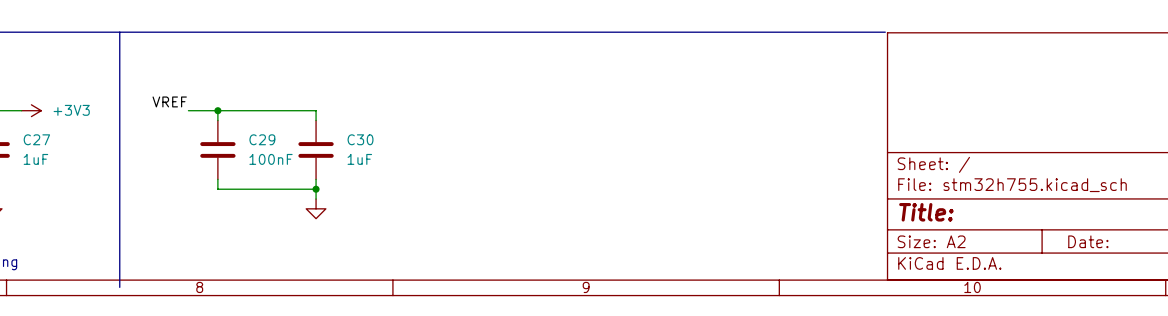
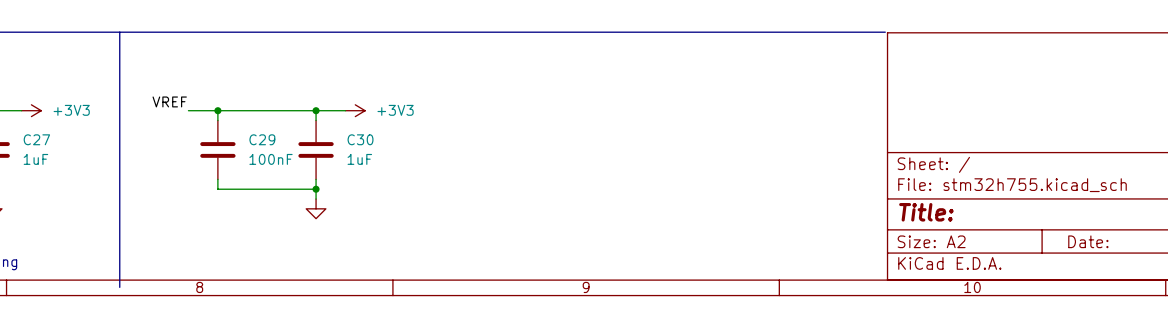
wire: none -> (316, 110) (345, 110)
junction: none -> (316, 110)
power symbol: none -> +3V3 (355, 110)

